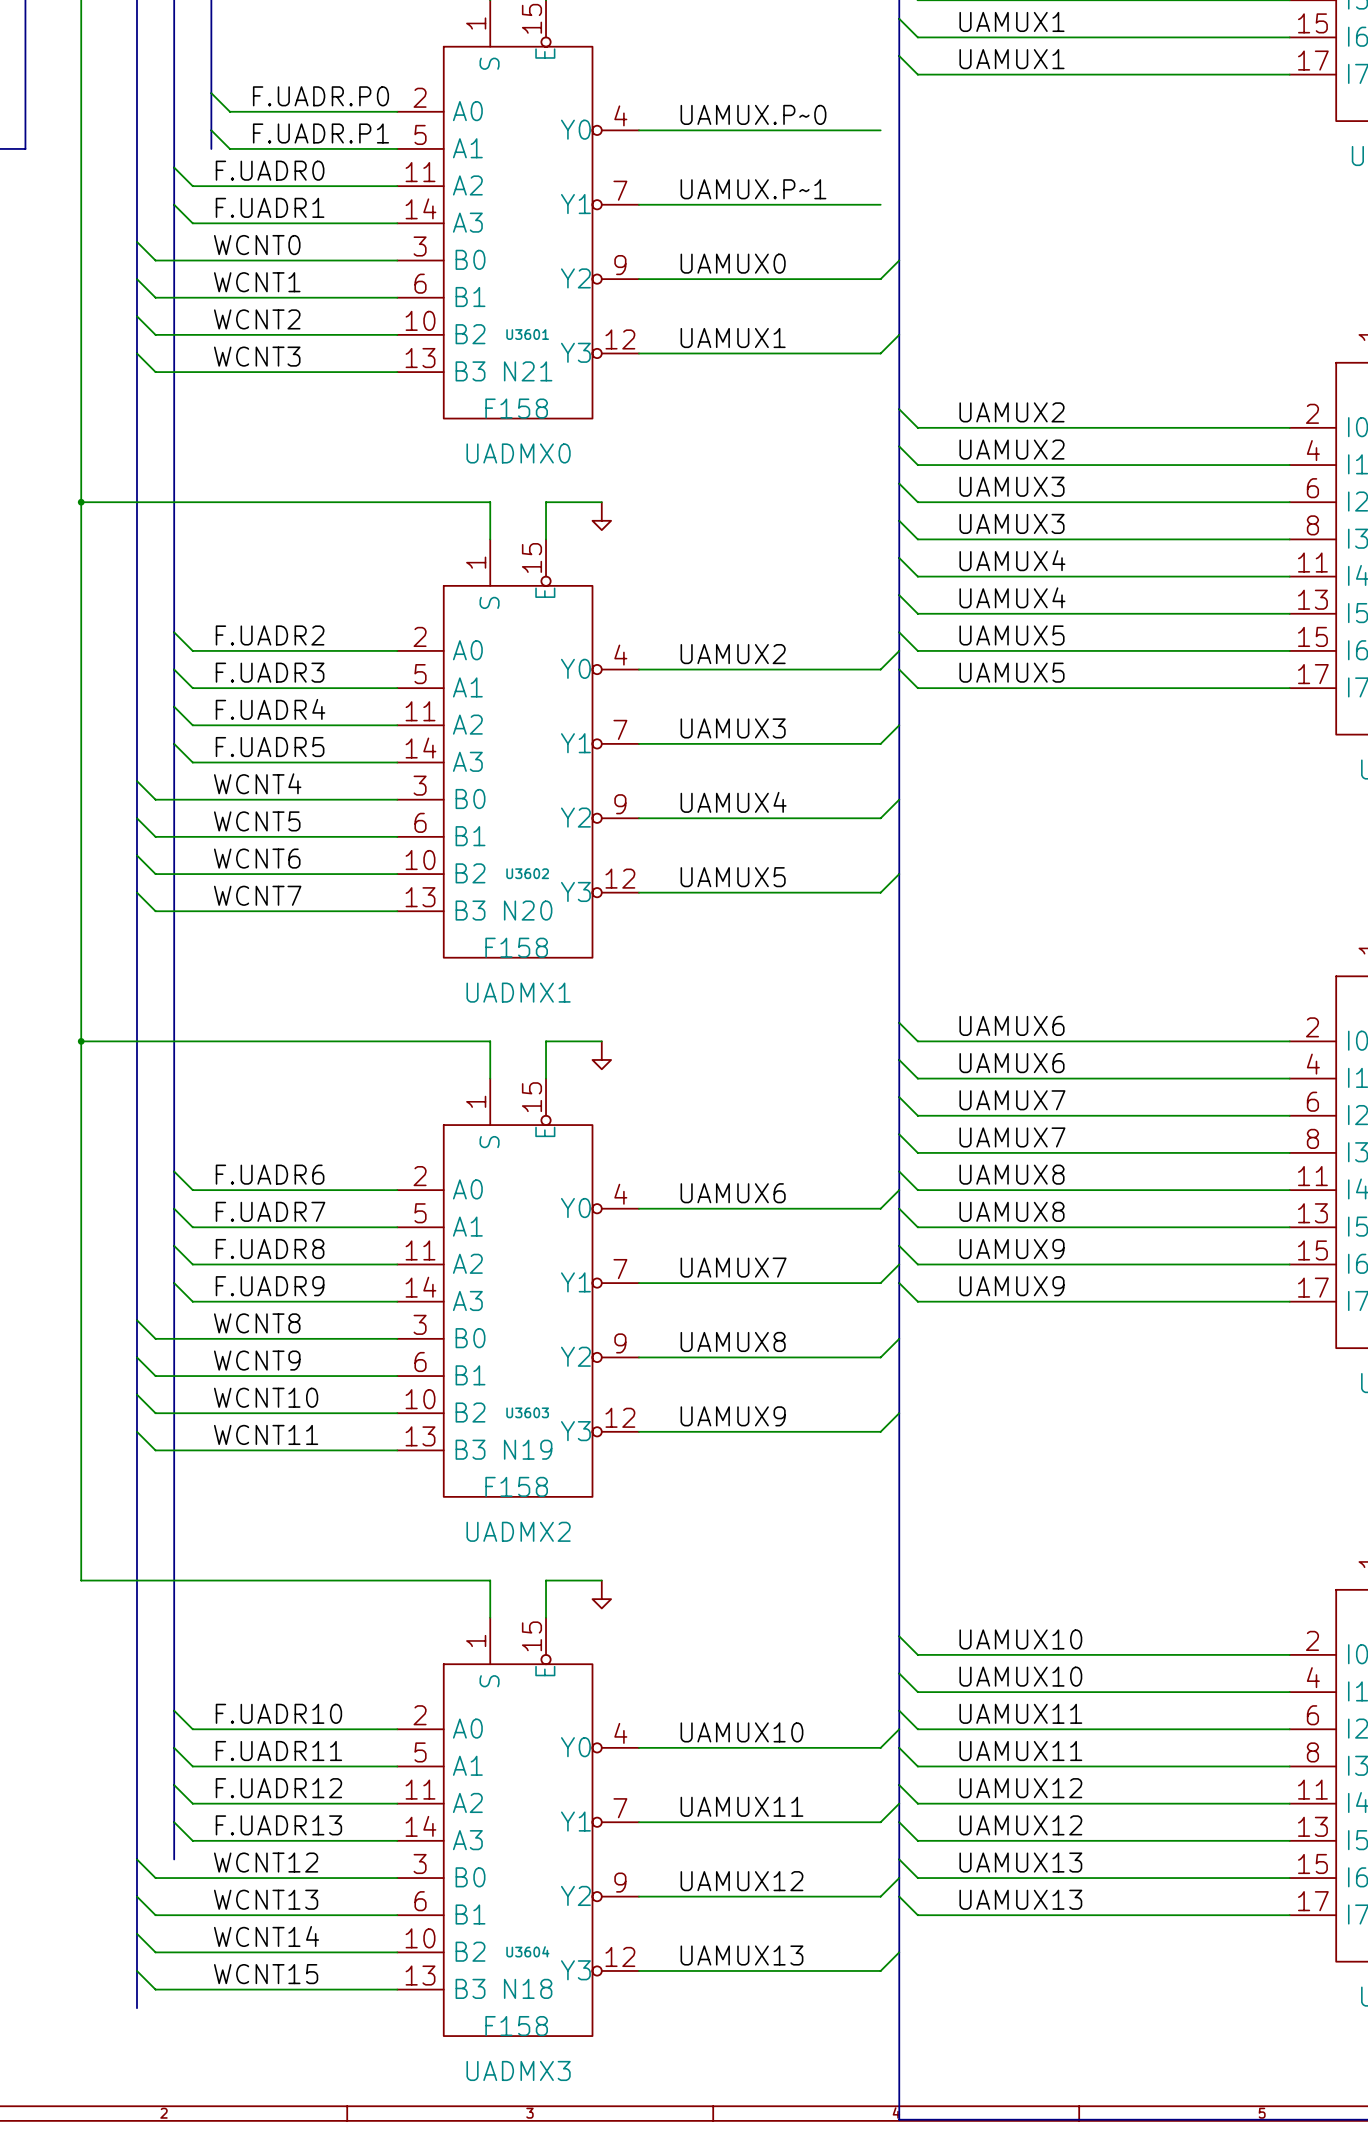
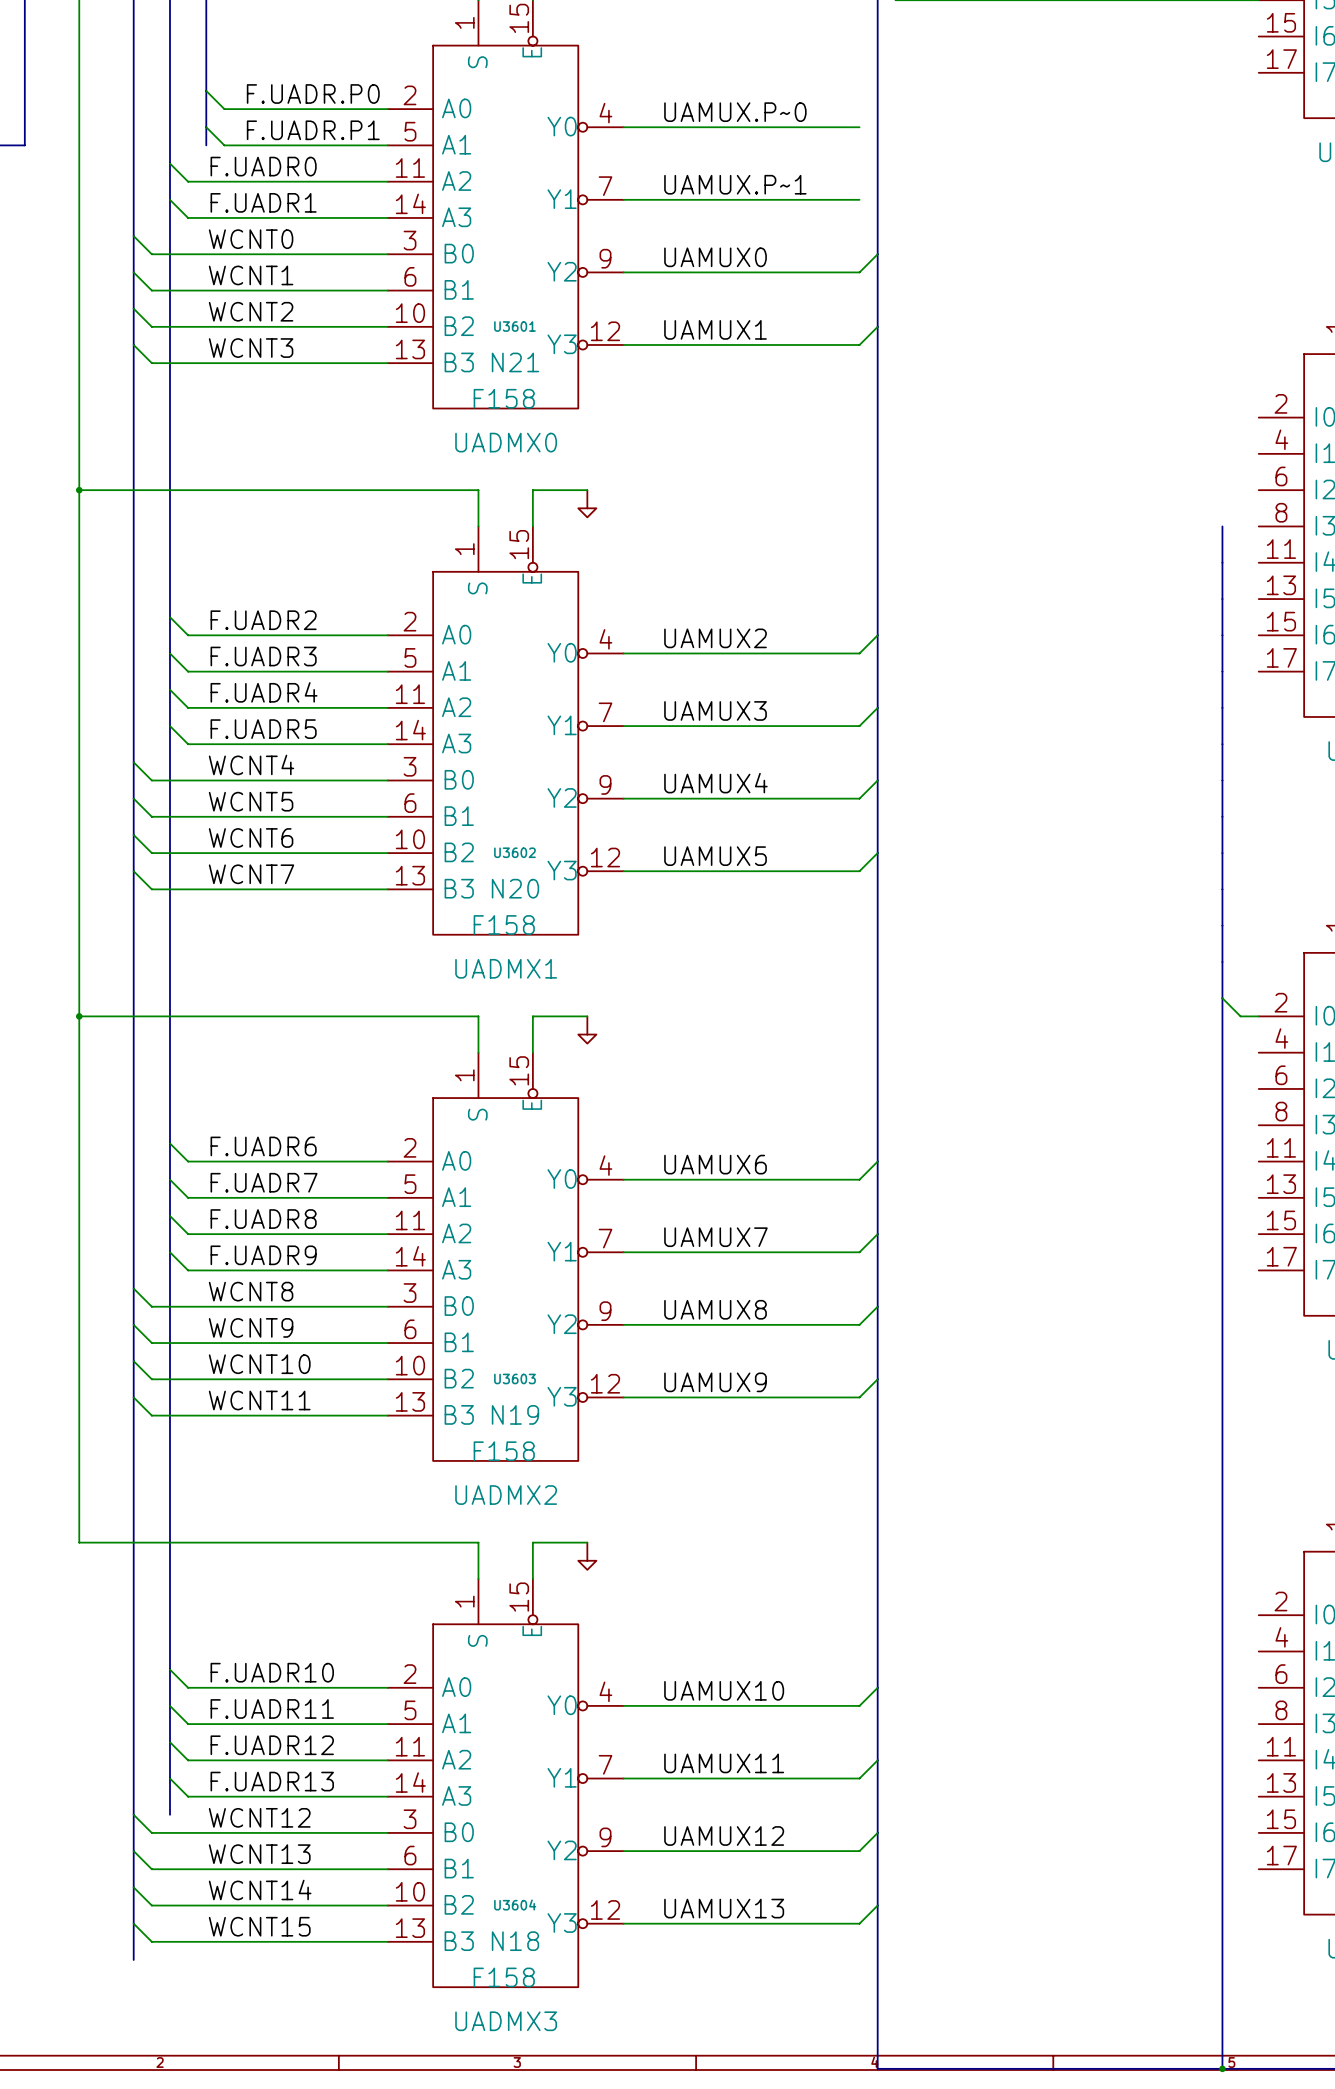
wire: (899, 18) (917, 37) (1289, 37) -> none
label: UAMUX1 (1011, 21) -> none
wire: (899, 56) (917, 74) (1289, 74) -> none
label: UAMUX1 (1011, 59) -> none
wire: (899, 409) (917, 427) (1289, 427) -> none
label: UAMUX2 (1011, 412) -> none
wire: (899, 446) (917, 465) (1289, 465) -> none
label: UAMUX2 (1011, 449) -> none
wire: (899, 483) (917, 502) (1289, 502) -> none
label: UAMUX3 (1011, 486) -> none
wire: (899, 520) (917, 539) (1289, 539) -> none
label: UAMUX3 (1011, 523) -> none
bus: none -> (1222, 526) (1222, 2068)
wire: (899, 557) (917, 576) (1289, 576) -> none
label: UAMUX4 (1012, 560) -> none
wire: (899, 595) (917, 613) (1289, 613) -> none
label: UAMUX4 (1012, 597) -> none
wire: (899, 632) (917, 650) (1289, 650) -> none
label: UAMUX5 (1011, 635) -> none
wire: (899, 669) (917, 688) (1289, 688) -> none
label: UAMUX5 (1011, 672) -> none
wire: (899, 1022) (917, 1041) (1271, 1041) -> (1222, 998) (1240, 1016)
label: UAMUX6 (1011, 1025) -> none
wire: (899, 1059) (917, 1078) (1289, 1078) -> none
label: UAMUX6 (1011, 1063) -> none
wire: (899, 1097) (917, 1115) (1289, 1115) -> none
label: UAMUX7 (1012, 1100) -> none
wire: (899, 1134) (917, 1152) (1289, 1152) -> none
label: UAMUX7 (1012, 1137) -> none
wire: (899, 1171) (917, 1190) (1289, 1190) -> none
label: UAMUX8 (1011, 1174) -> none
wire: (899, 1208) (917, 1227) (1289, 1227) -> none
label: UAMUX8 (1011, 1211) -> none
wire: (899, 1245) (917, 1264) (1289, 1264) -> none
label: UAMUX9 (1011, 1249) -> none
wire: (899, 1283) (917, 1301) (1289, 1301) -> none
label: UAMUX9 (1011, 1286) -> none
wire: (899, 1636) (917, 1654) (1289, 1654) -> none
label: UAMUX10 (1020, 1639) -> none
wire: (899, 1673) (917, 1692) (1289, 1692) -> none
label: UAMUX10 (1020, 1676) -> none
wire: (899, 1710) (917, 1729) (1289, 1729) -> none
label: UAMUX11 (1020, 1713) -> none
wire: (899, 1747) (917, 1766) (1289, 1766) -> none
label: UAMUX11 (1020, 1751) -> none
wire: (899, 1785) (917, 1803) (1289, 1803) -> none
label: UAMUX12 (1020, 1788) -> none
wire: (899, 1822) (917, 1840) (1289, 1840) -> none
label: UAMUX12 (1020, 1825) -> none
wire: (899, 1859) (917, 1878) (1289, 1878) -> none
label: UAMUX13 (1020, 1862) -> none
wire: (899, 1896) (917, 1915) (1289, 1915) -> none
label: UAMUX13 (1020, 1899) -> none
junction: none -> (1222, 2068)

